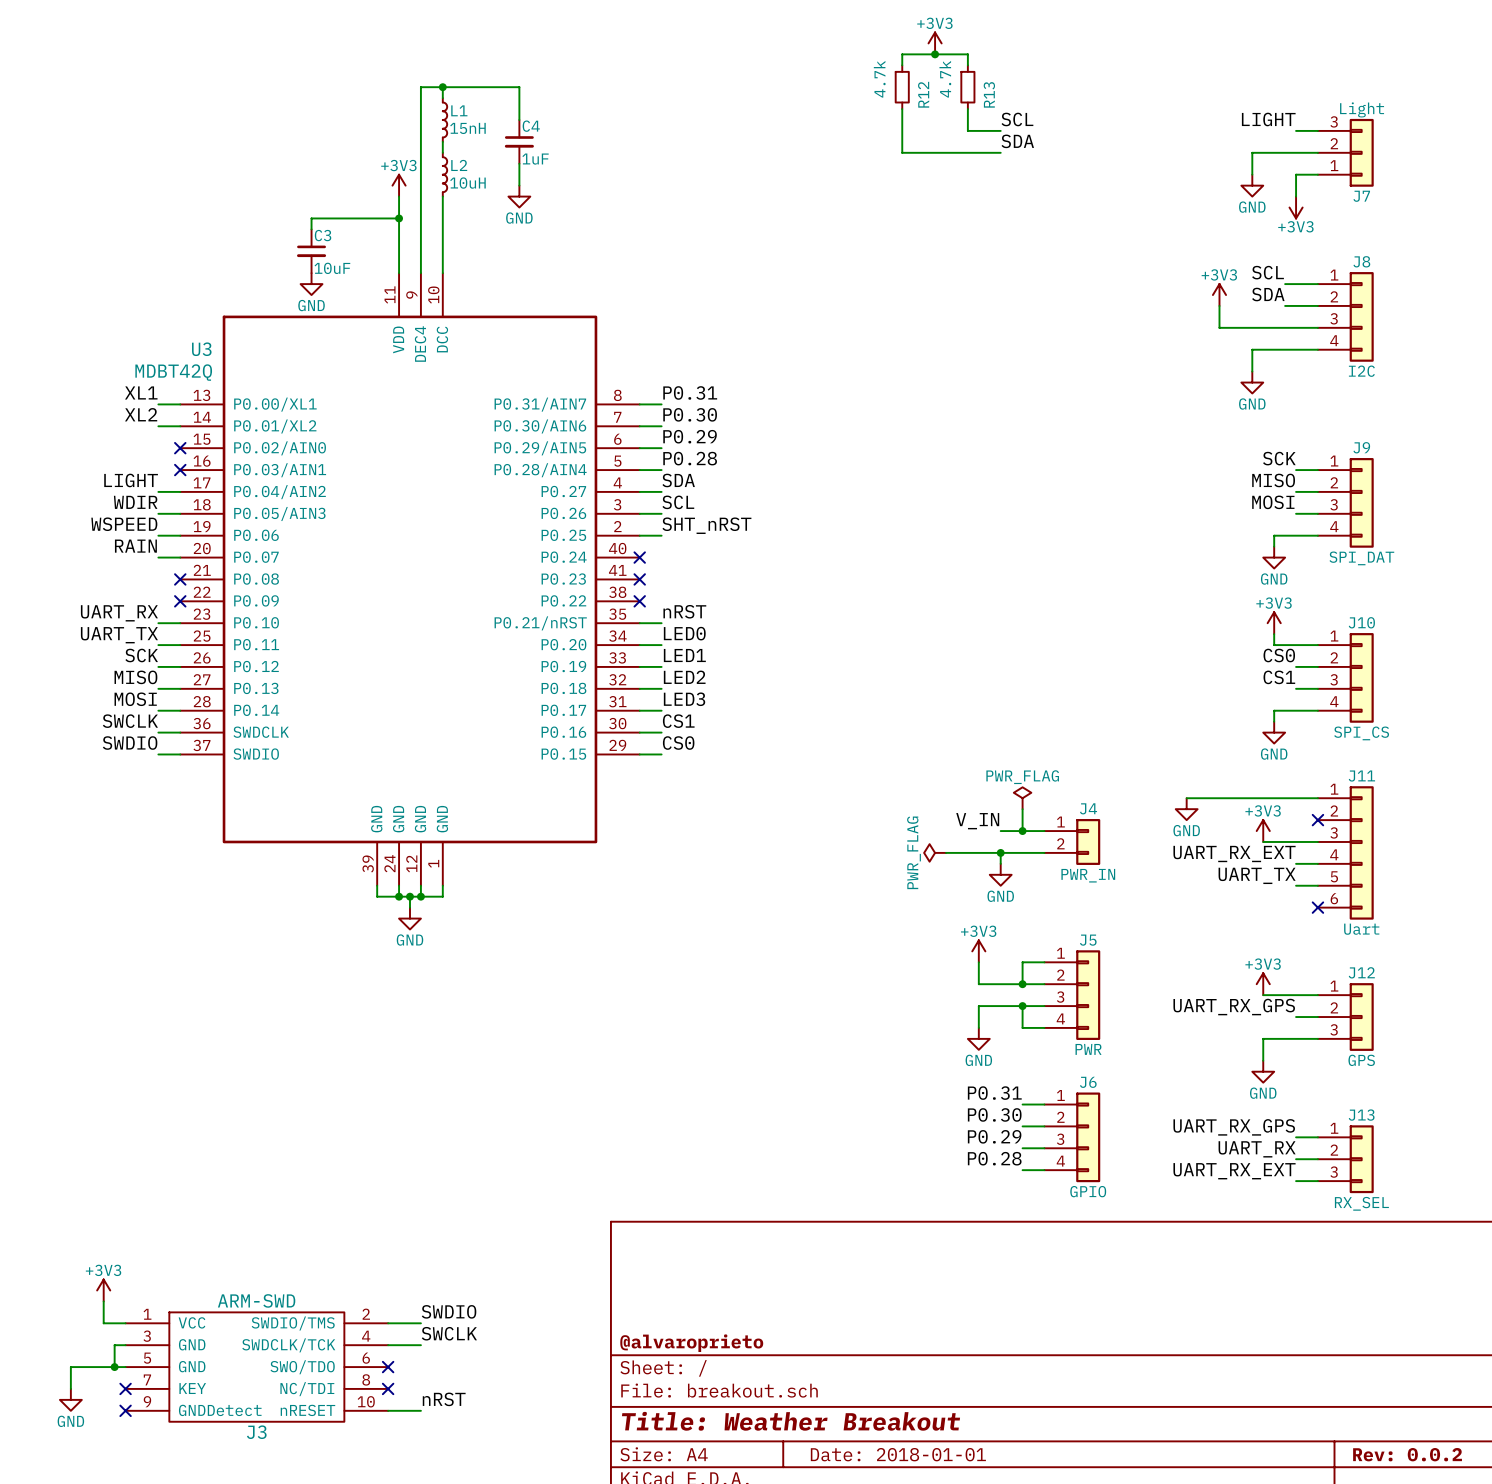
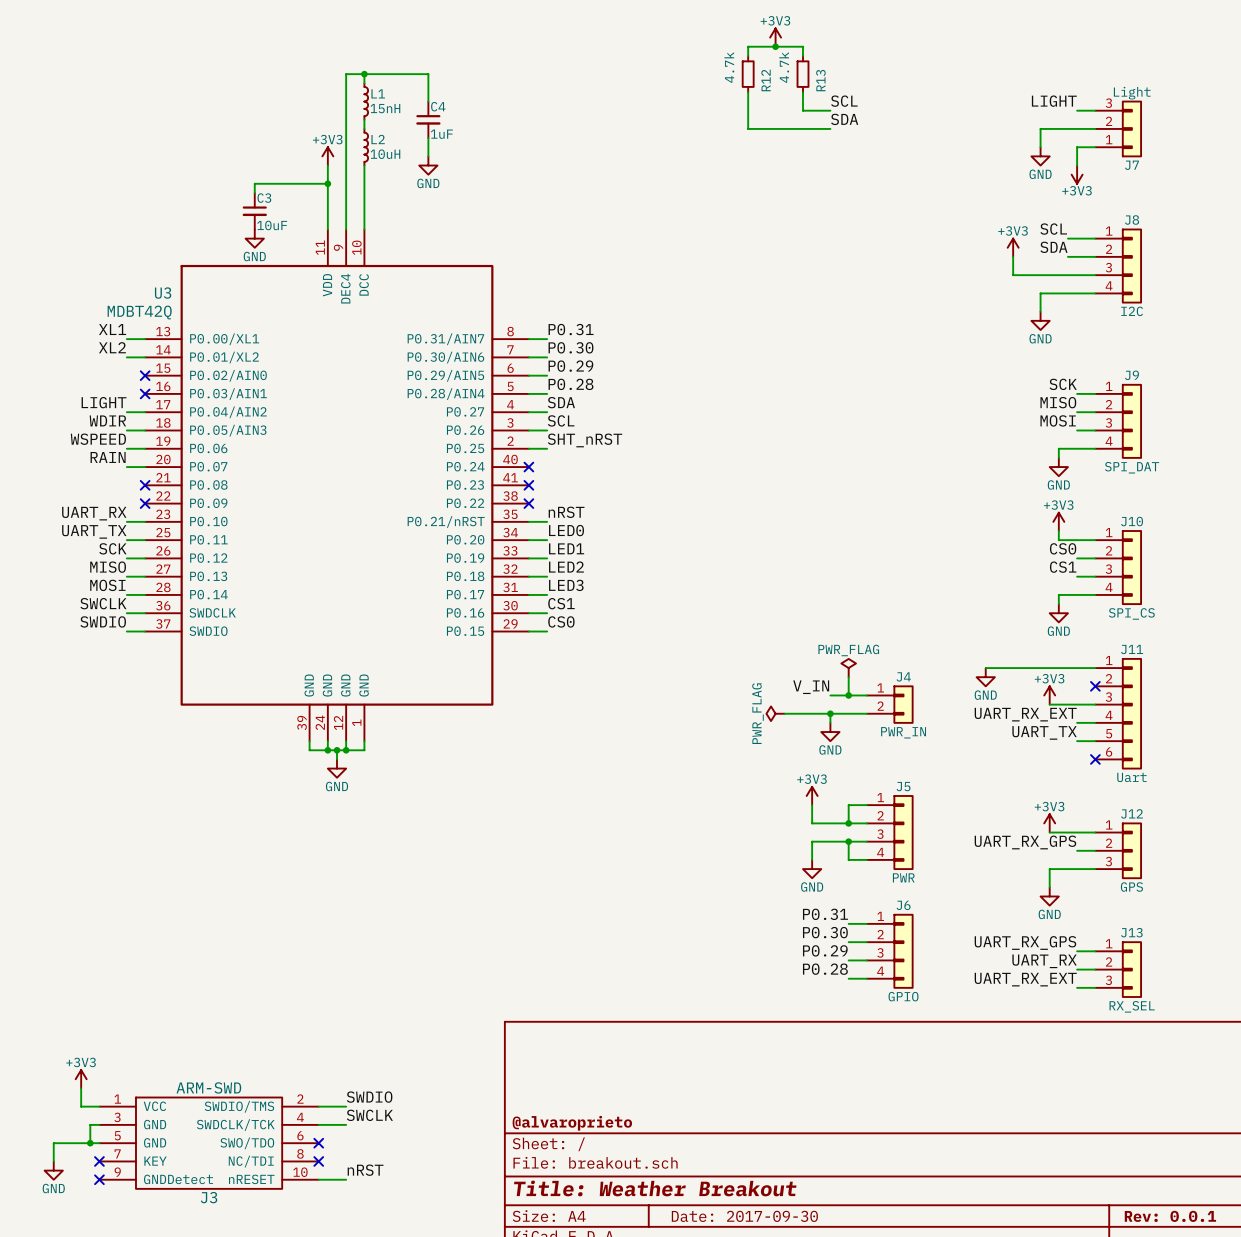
title block: Date: 2018-01-01 (898, 1454) -> Date: 2017-09-30 (744, 1216)
title block: Rev: 0.0.2 (1407, 1454) -> Rev: 0.0.1 (1170, 1216)

